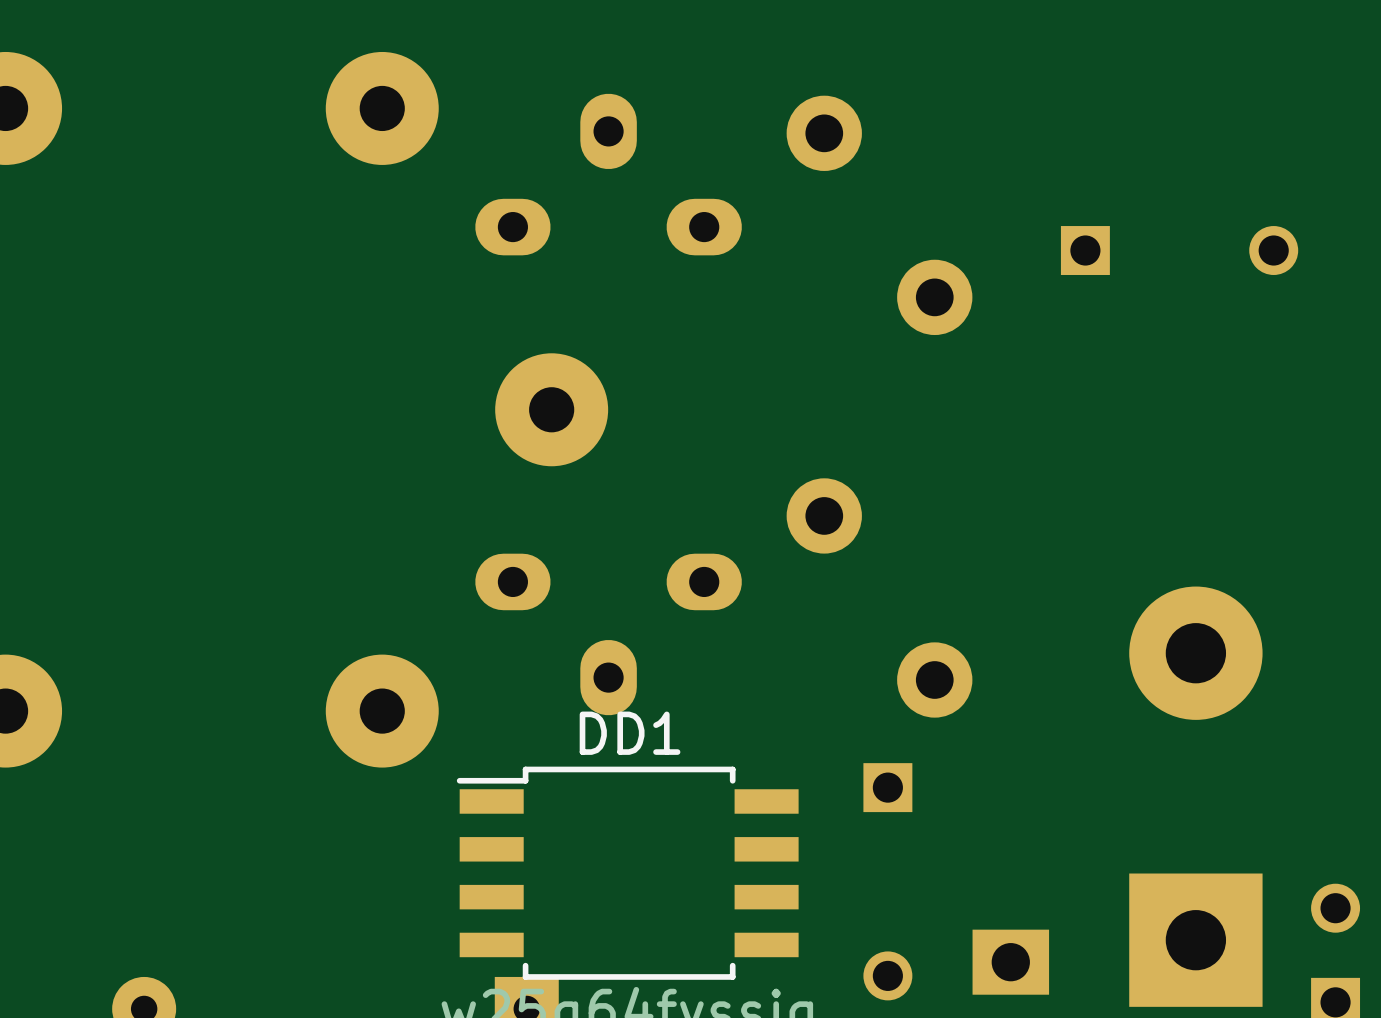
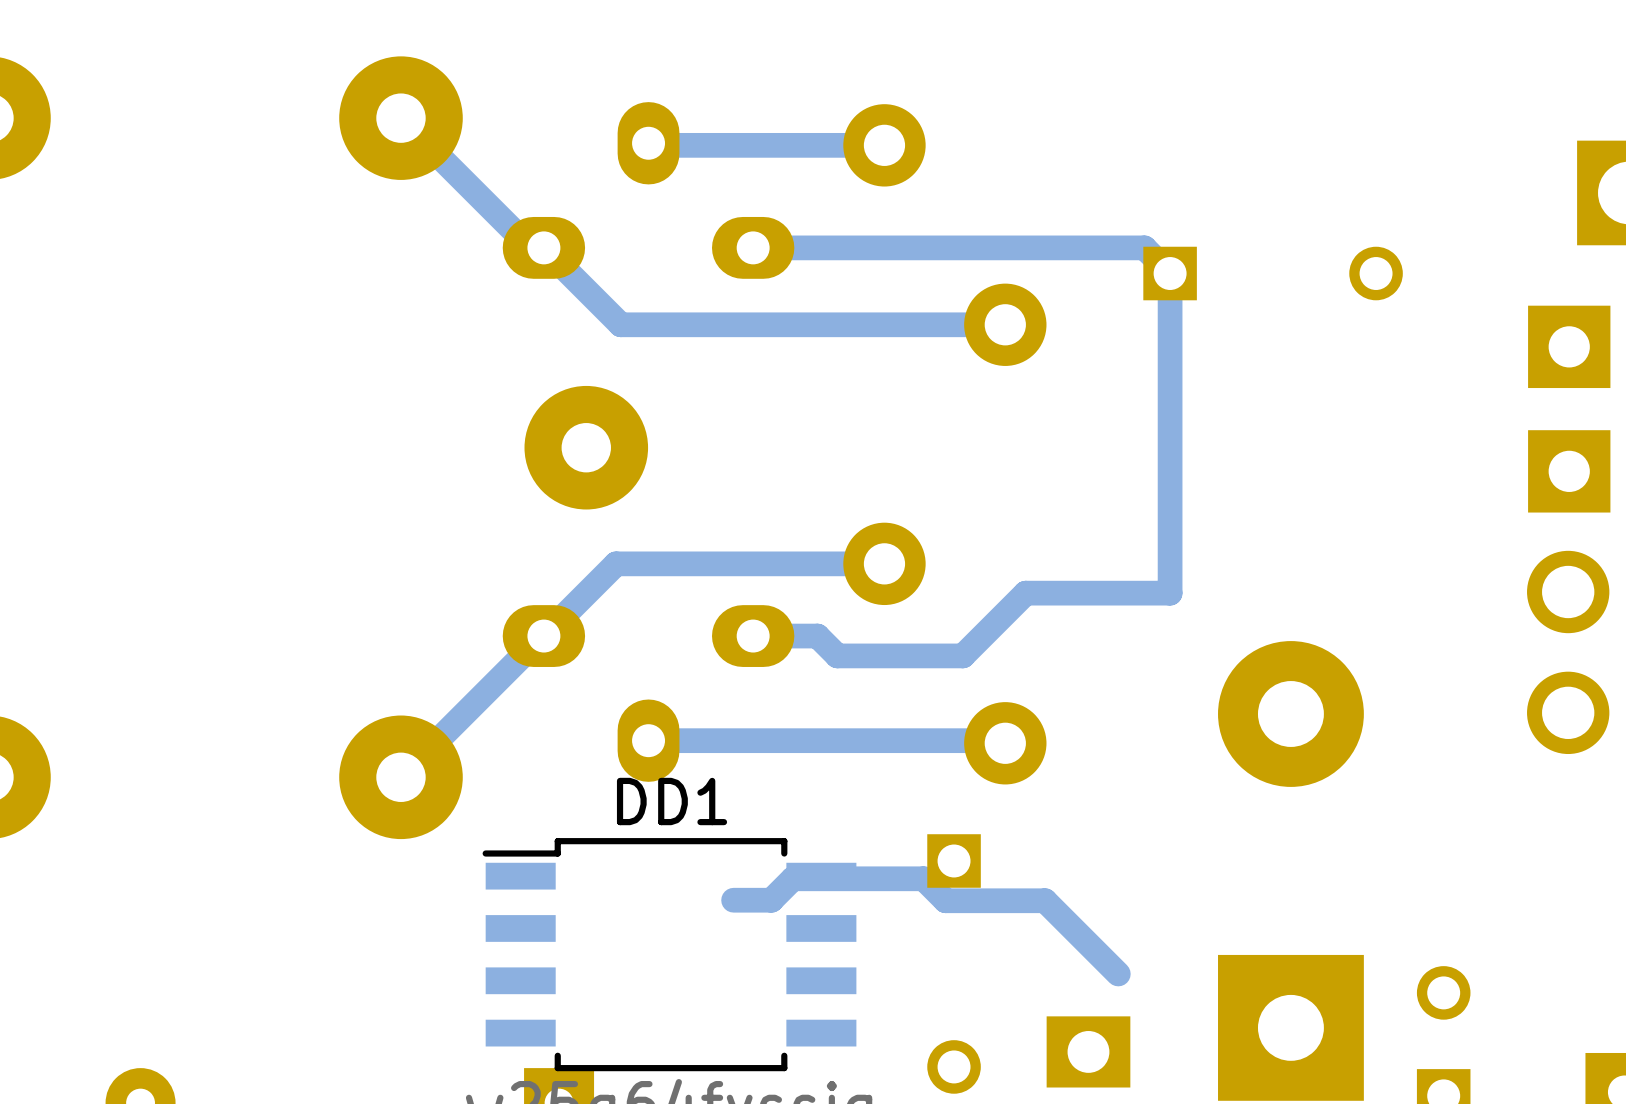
track: none -> (400, 118) (530, 247) (543, 247) (620, 324) (1005, 324)
track: none -> (648, 143) (650, 145) (884, 145)
track: none -> (762, 238) (753, 247) (1144, 247) (1170, 273) (1170, 593) (1025, 593) (962, 655) (837, 655) (817, 636) (753, 636)
track: none -> (884, 563) (616, 563) (400, 777)
track: none -> (648, 740) (1002, 740) (1005, 743)
track: none -> (733, 900) (771, 900) (792, 878) (923, 878) (945, 900) (1045, 900) (1118, 973)

